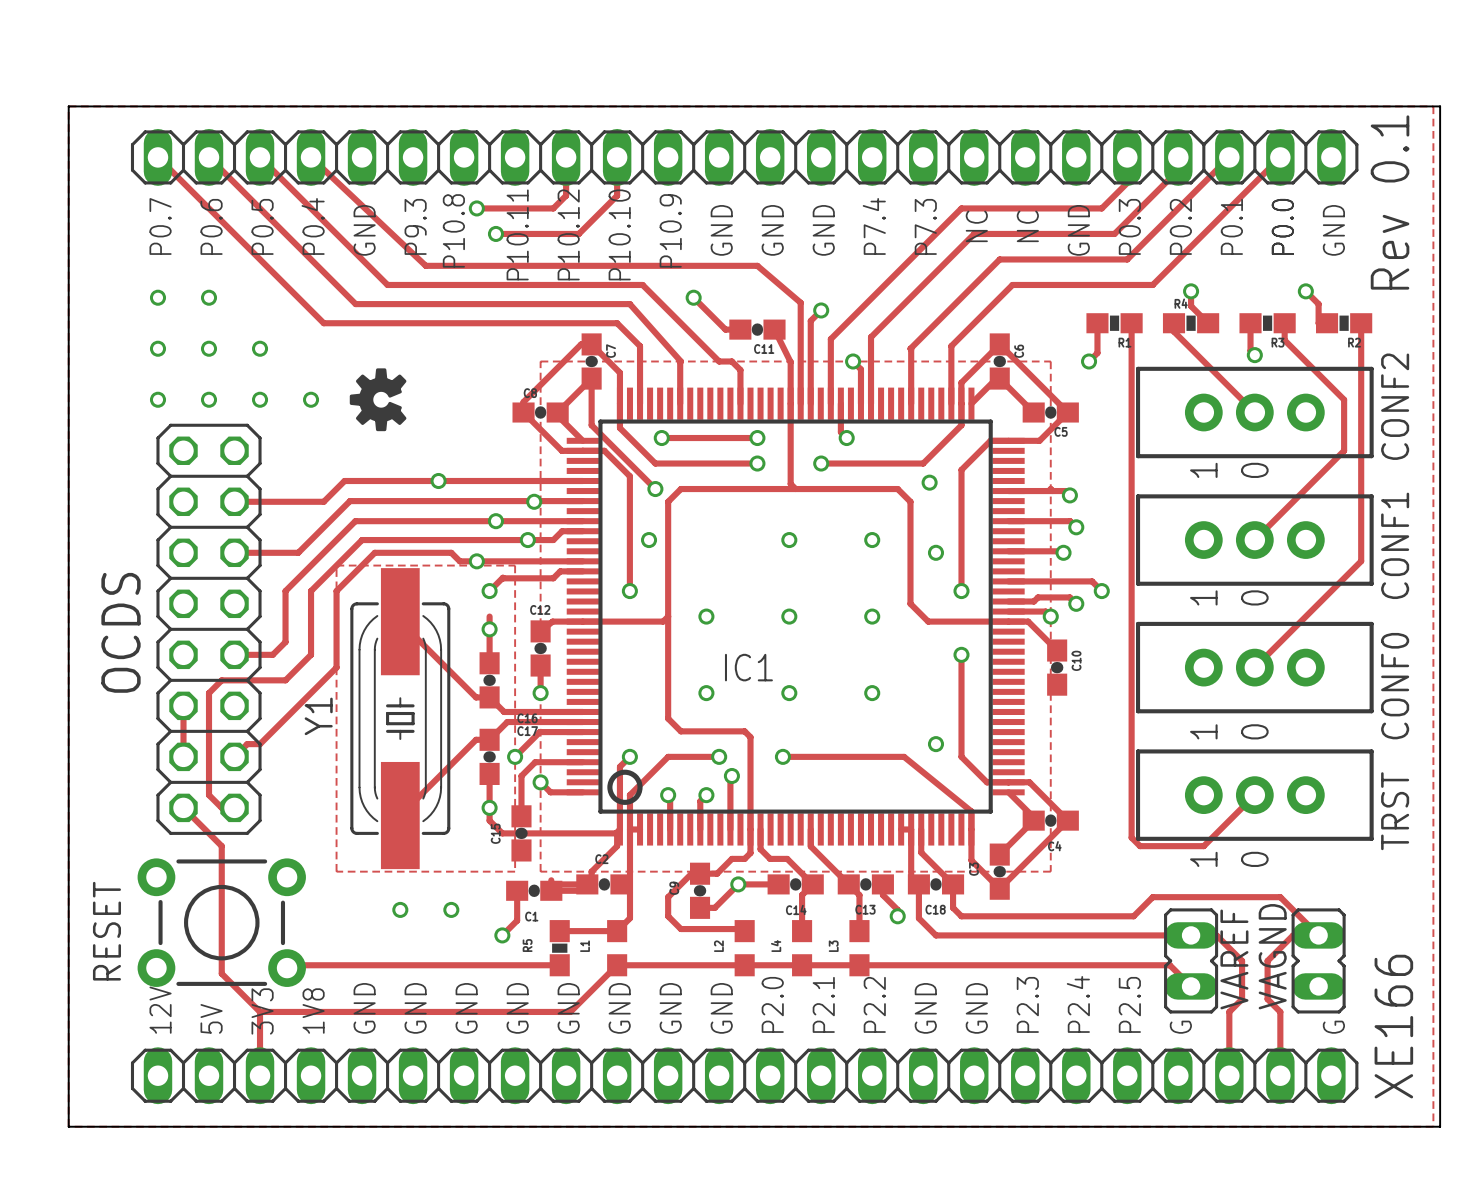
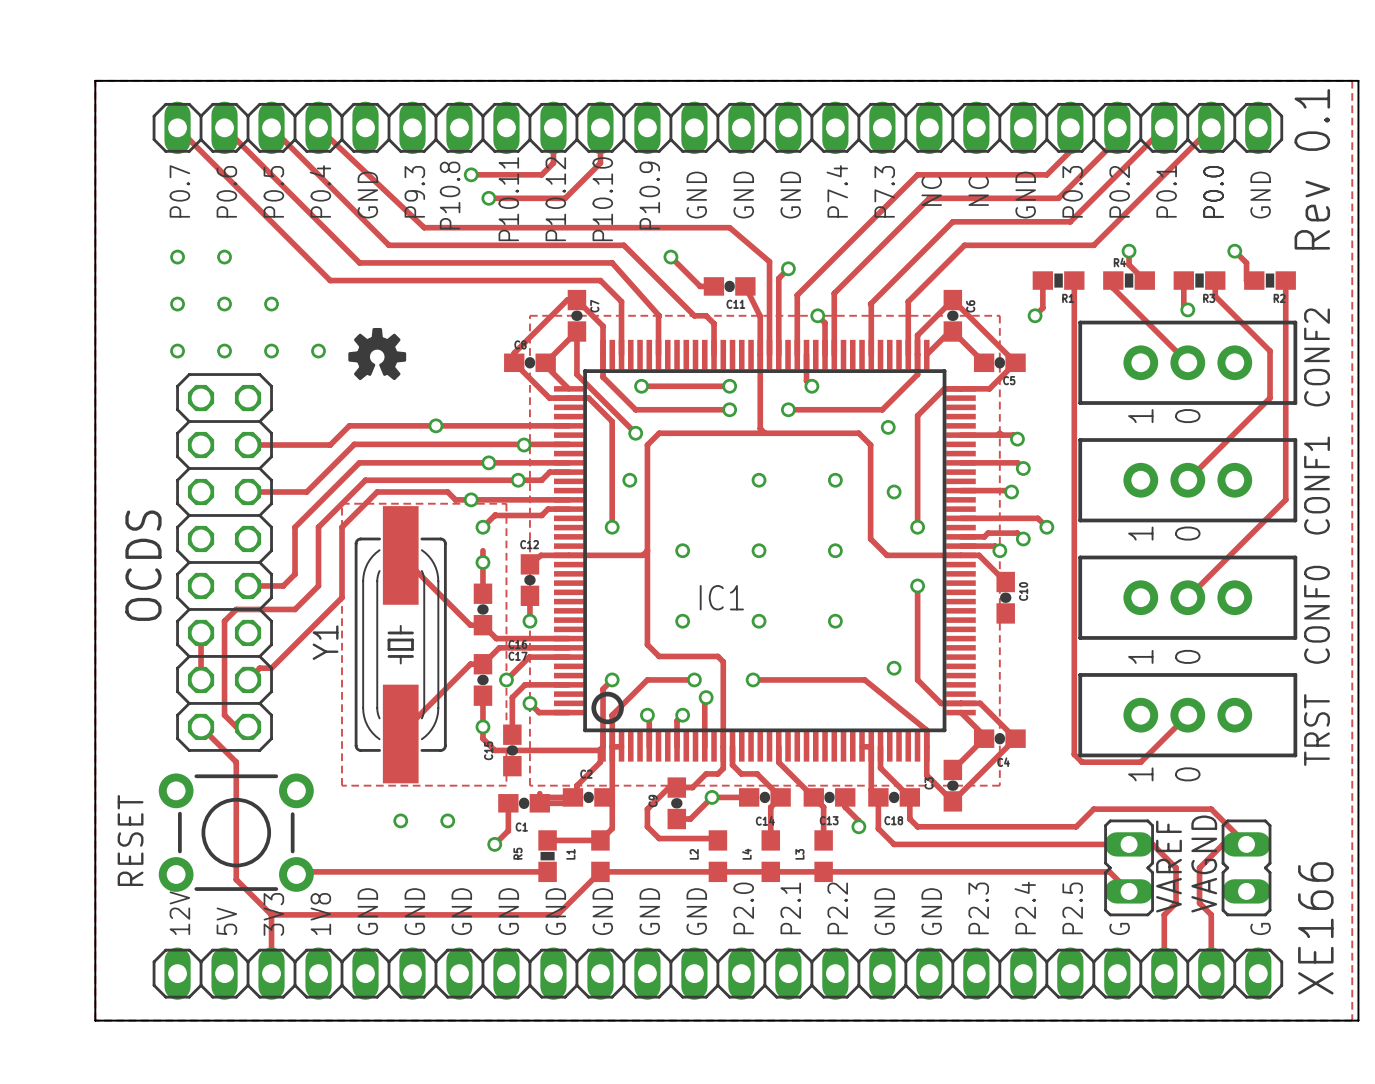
drawing shape: [349, 368, 407, 432] -> [348, 327, 407, 381]

